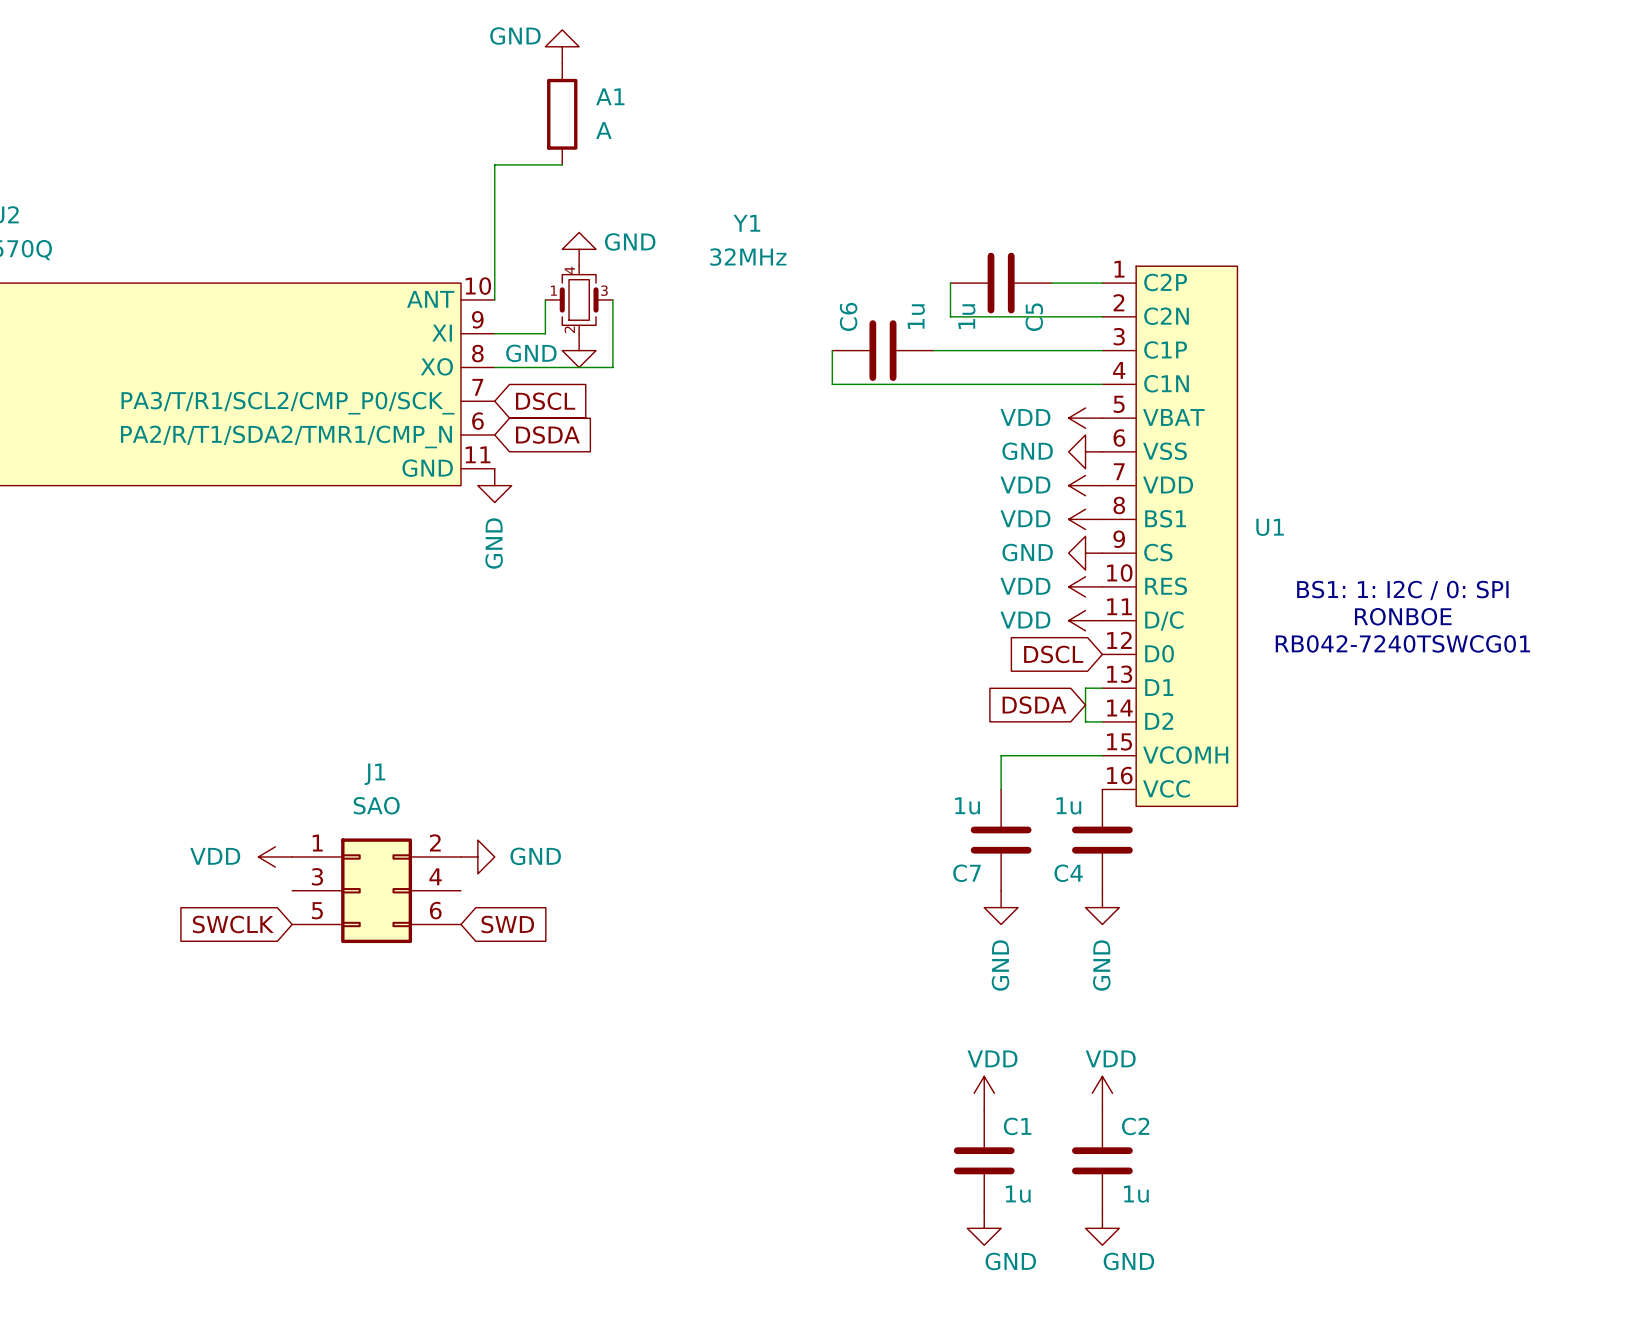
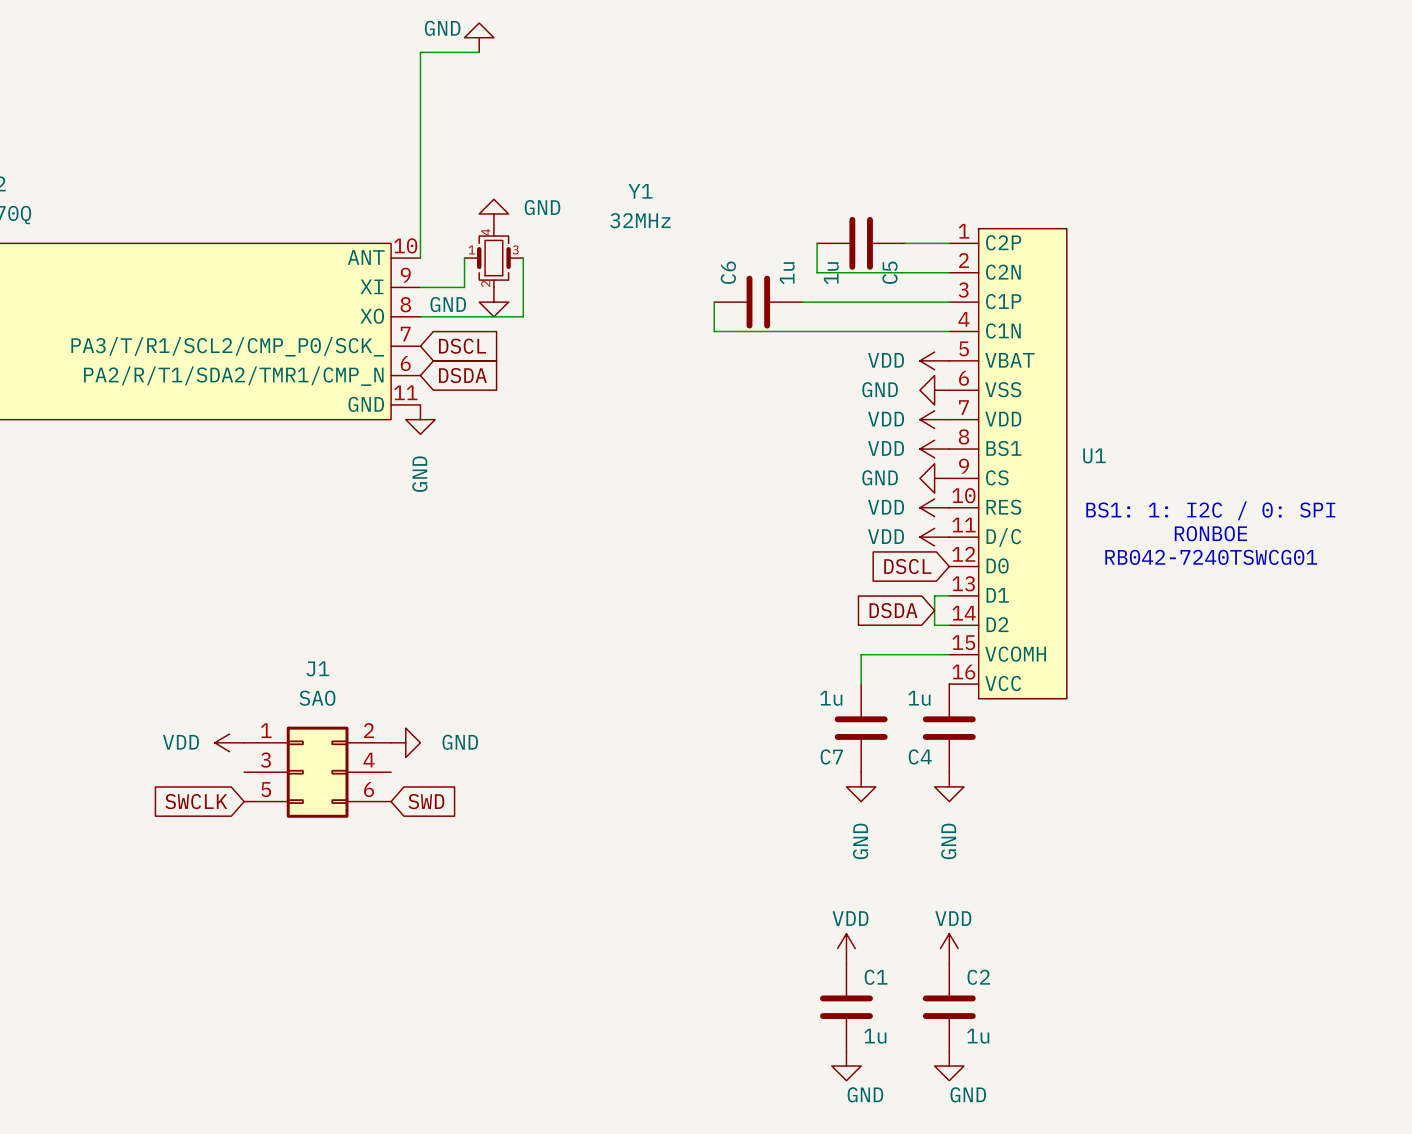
A1: A (562, 114) -> none
wire: (494, 164) (562, 164) -> (420, 140) (420, 52) (479, 52)

